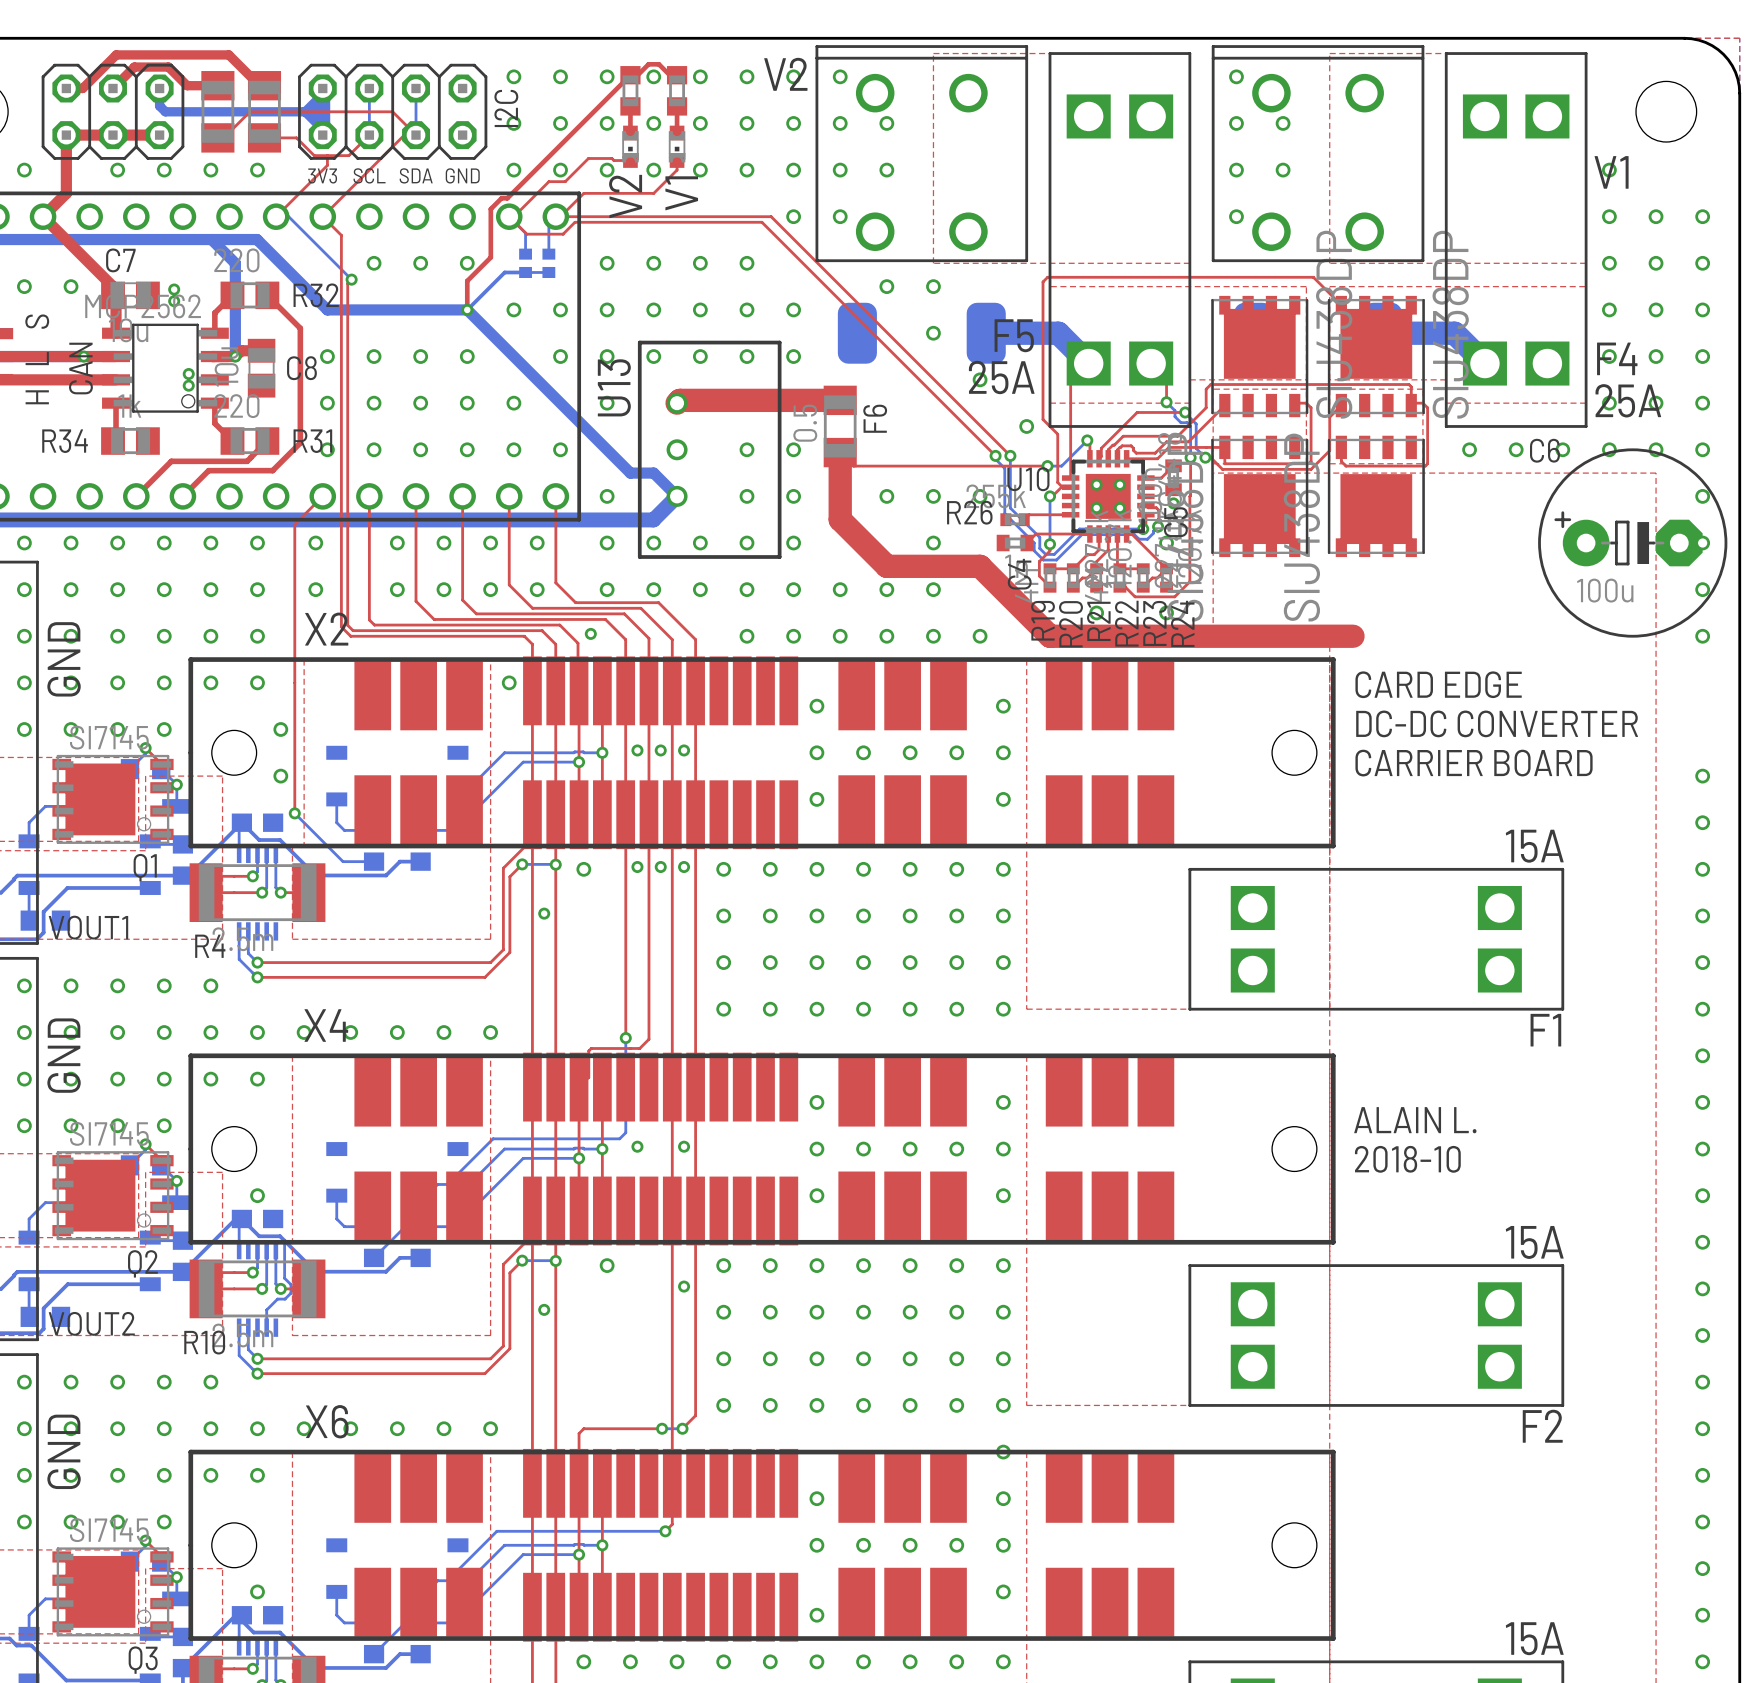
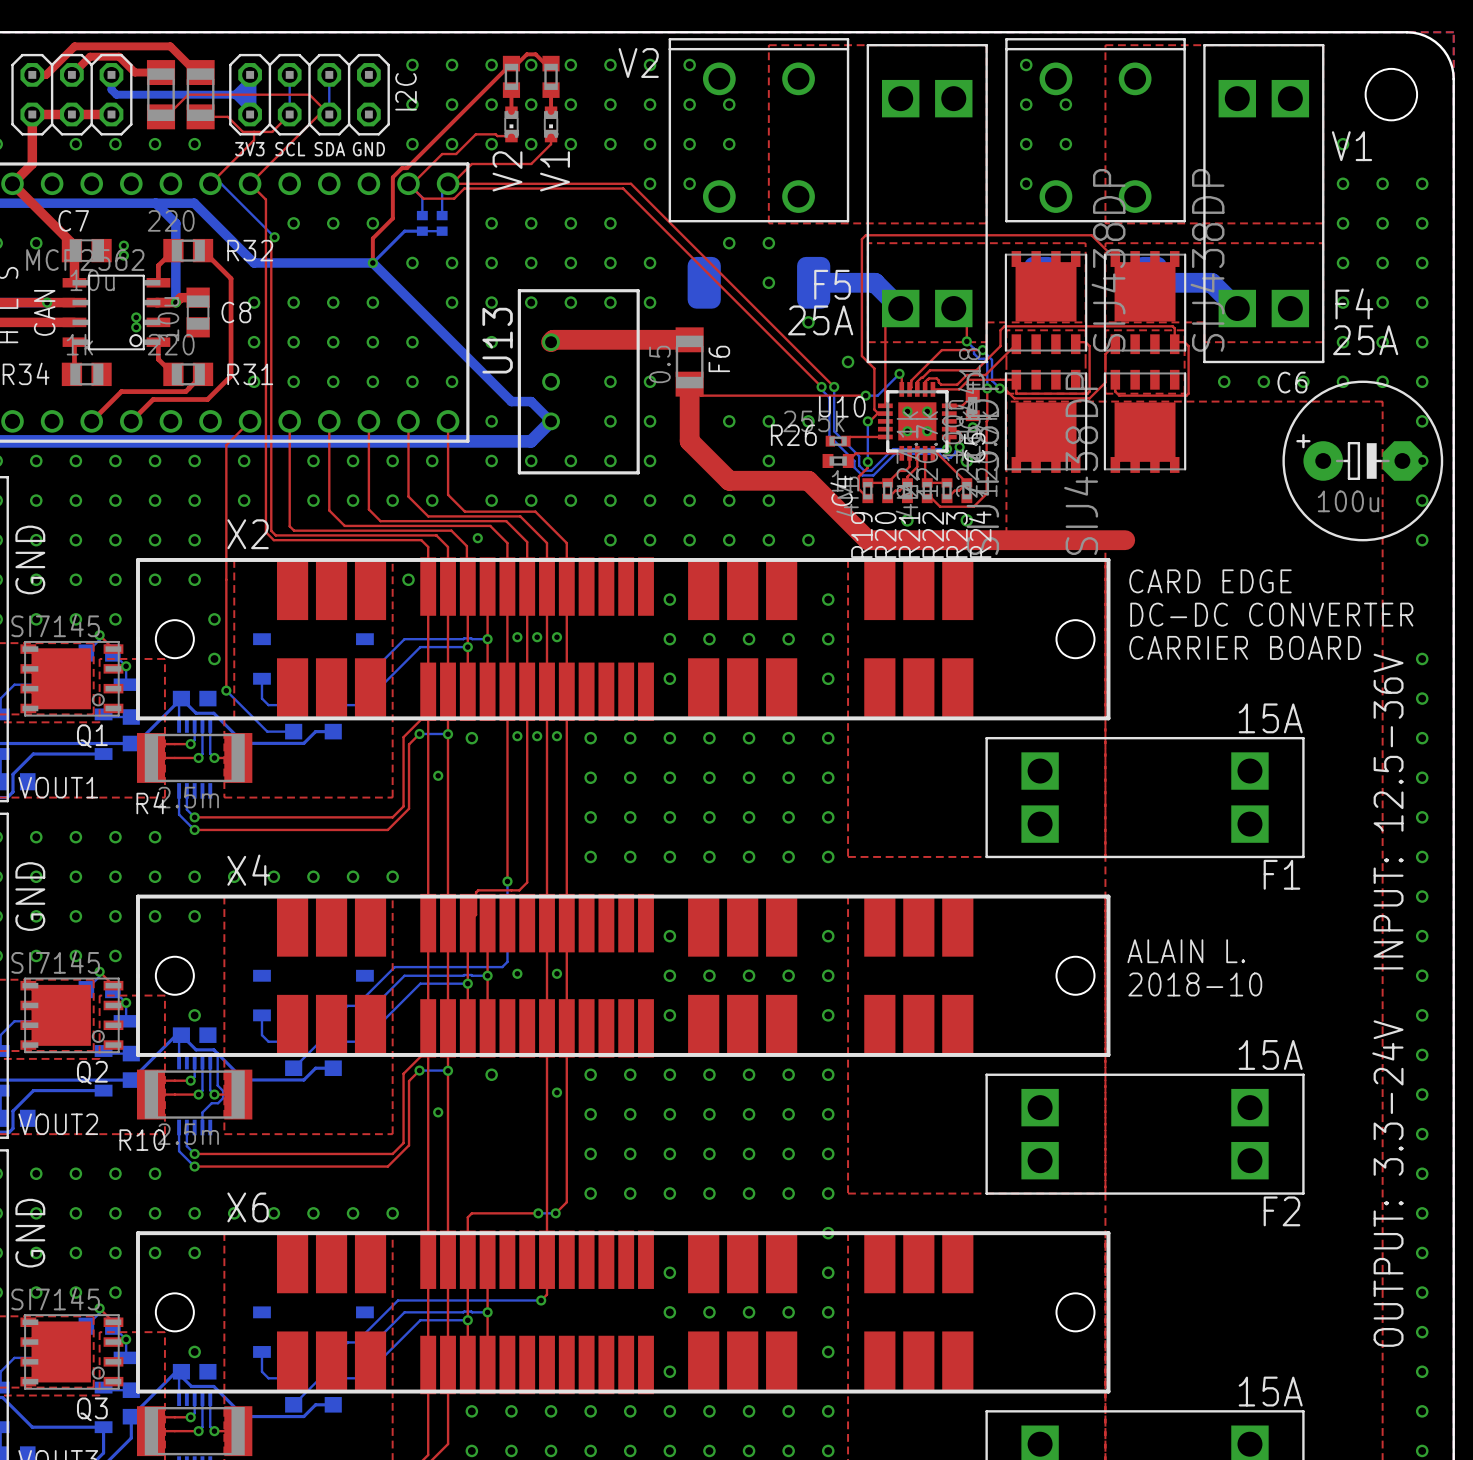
text: none -> INPUT: 12.5-36V (1388, 811)
text: none -> OUTPUT: 3.3-24V (1387, 1183)

